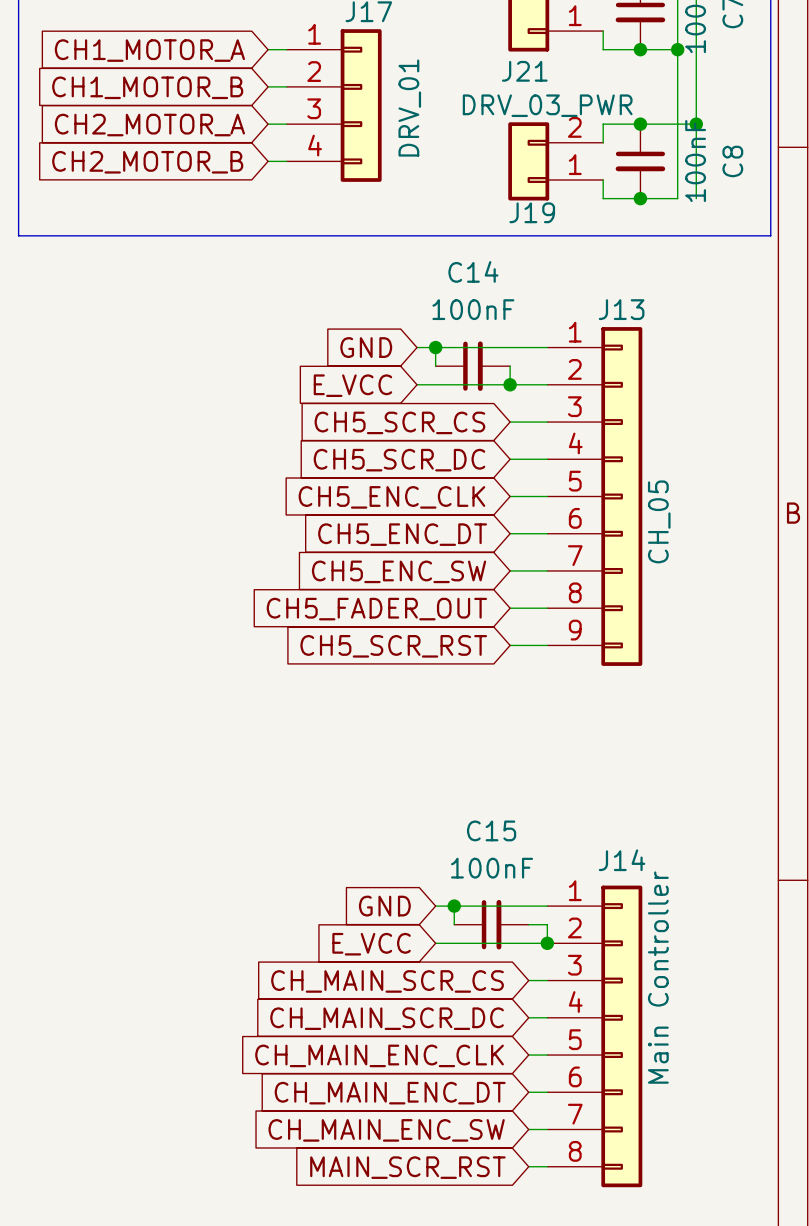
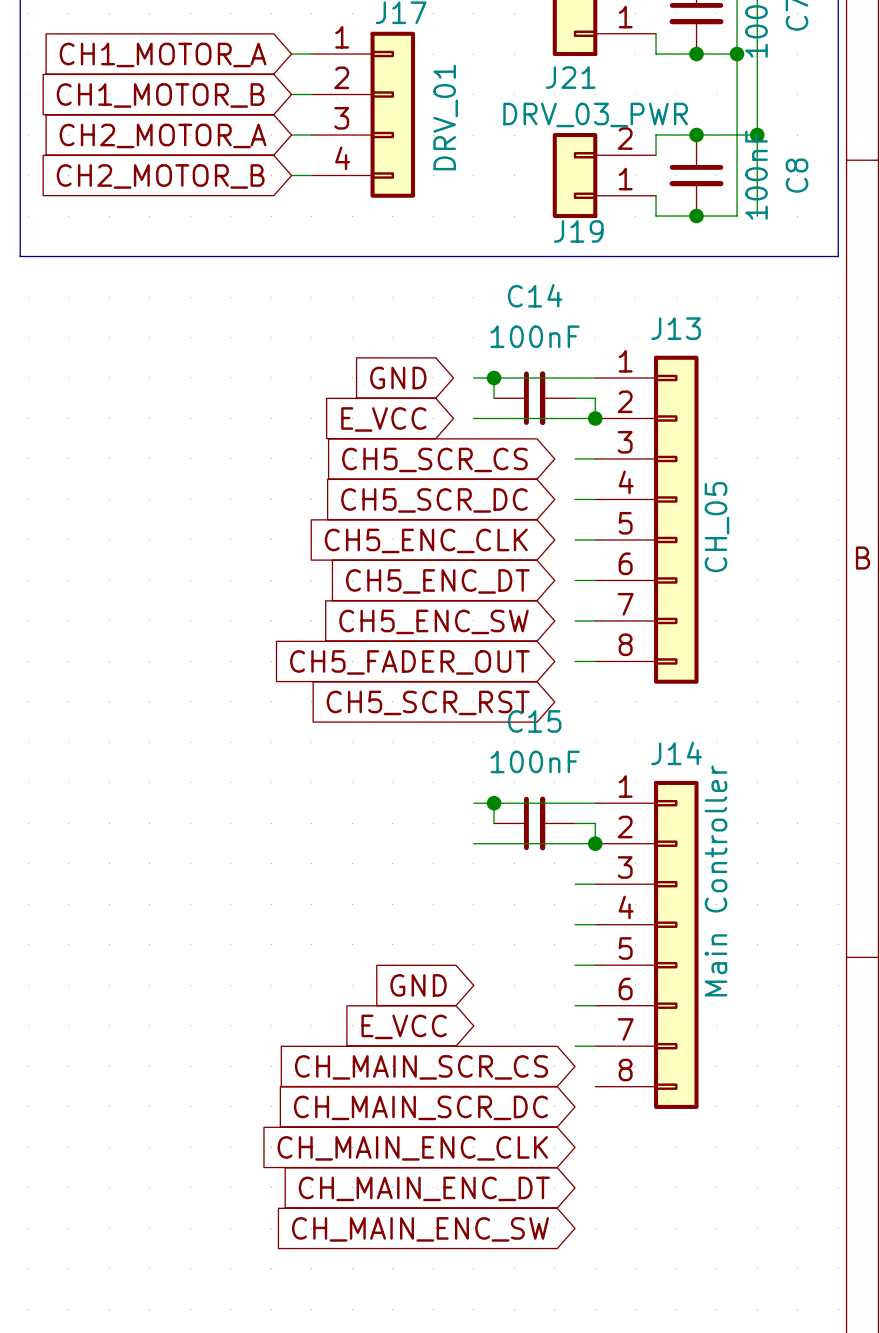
J13 symbol: [547, 327, 643, 666] -> [595, 355, 699, 684]
wire: (417, 347) (435, 347) (435, 366) -> (575, 398) (595, 398) (595, 418)
junction position: (435, 347) -> (494, 377)
C14 position: (472, 366) -> (534, 398)
wire: (510, 366) (510, 384) -> (494, 377) (494, 398)
wire: (417, 384) (435, 384) -> none
junction: (510, 384) -> none
junction: none -> (595, 418)
wire: (510, 422) (528, 422) -> none
wire: (510, 459) (528, 459) -> none
wire: (510, 496) (528, 496) -> none
wire: (510, 533) (528, 533) -> none
wire: (510, 570) (528, 570) -> none
wire: (510, 608) (528, 608) -> none
wire: (510, 645) (547, 645) -> none
junction: none -> (494, 803)
wire: none -> (575, 823) (595, 823) (595, 843) (473, 843)
junction: none -> (595, 843)
wire: (435, 906) (547, 906) -> (473, 803) (595, 803)
wire: (454, 906) (454, 924) -> (494, 803) (494, 823)
junction: (454, 906) -> none
C15 position: (491, 924) -> (534, 823)
wire: (547, 924) (547, 943) (435, 943) -> none
junction: (547, 943) -> none
wire: (528, 980) (547, 980) -> (575, 884) (595, 884)
wire: (528, 1017) (547, 1017) -> (575, 924) (595, 924)
J14 position: (594, 1036) -> (646, 944)
wire: (528, 1055) (547, 1055) -> (575, 965) (595, 965)
wire: (528, 1092) (547, 1092) -> none
wire: (528, 1129) (547, 1129) -> (575, 1046) (595, 1046)
wire: (528, 1166) (547, 1166) -> none
global label: MAIN_SCR_RST (407, 1167) -> none

